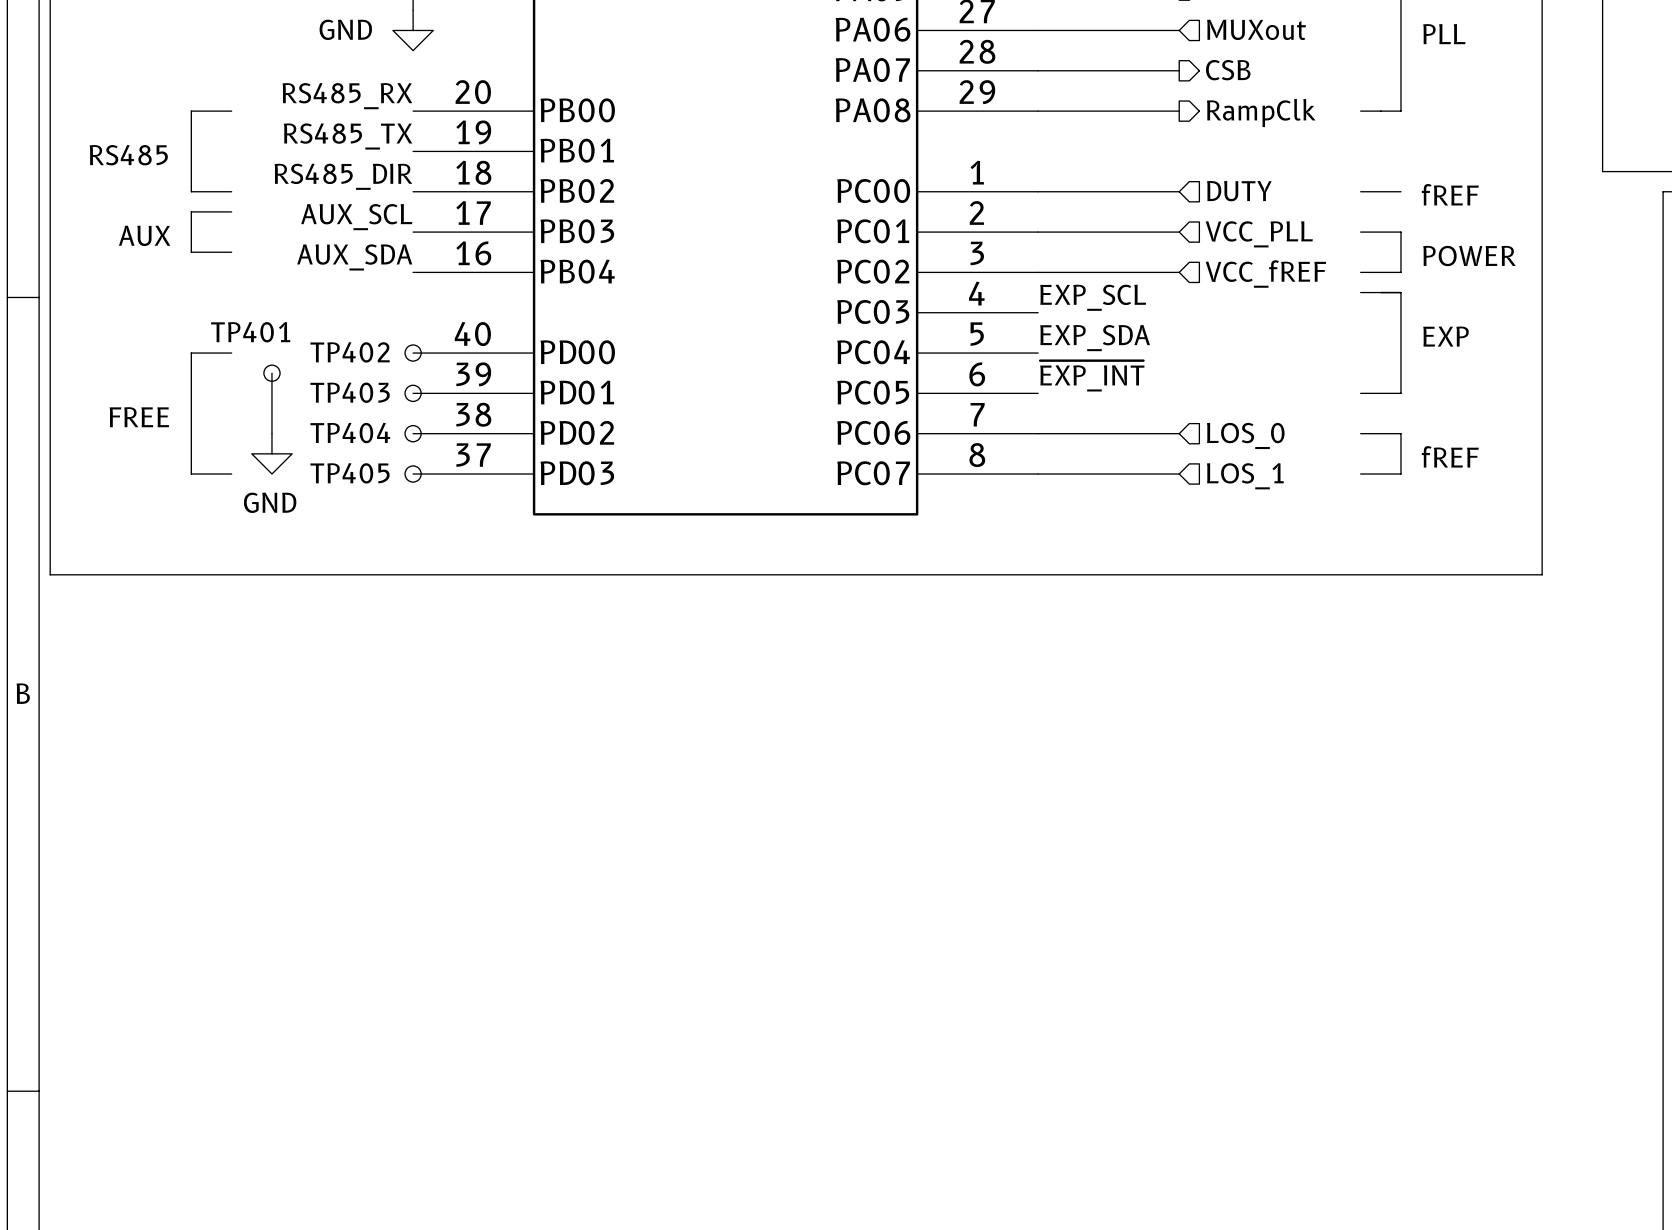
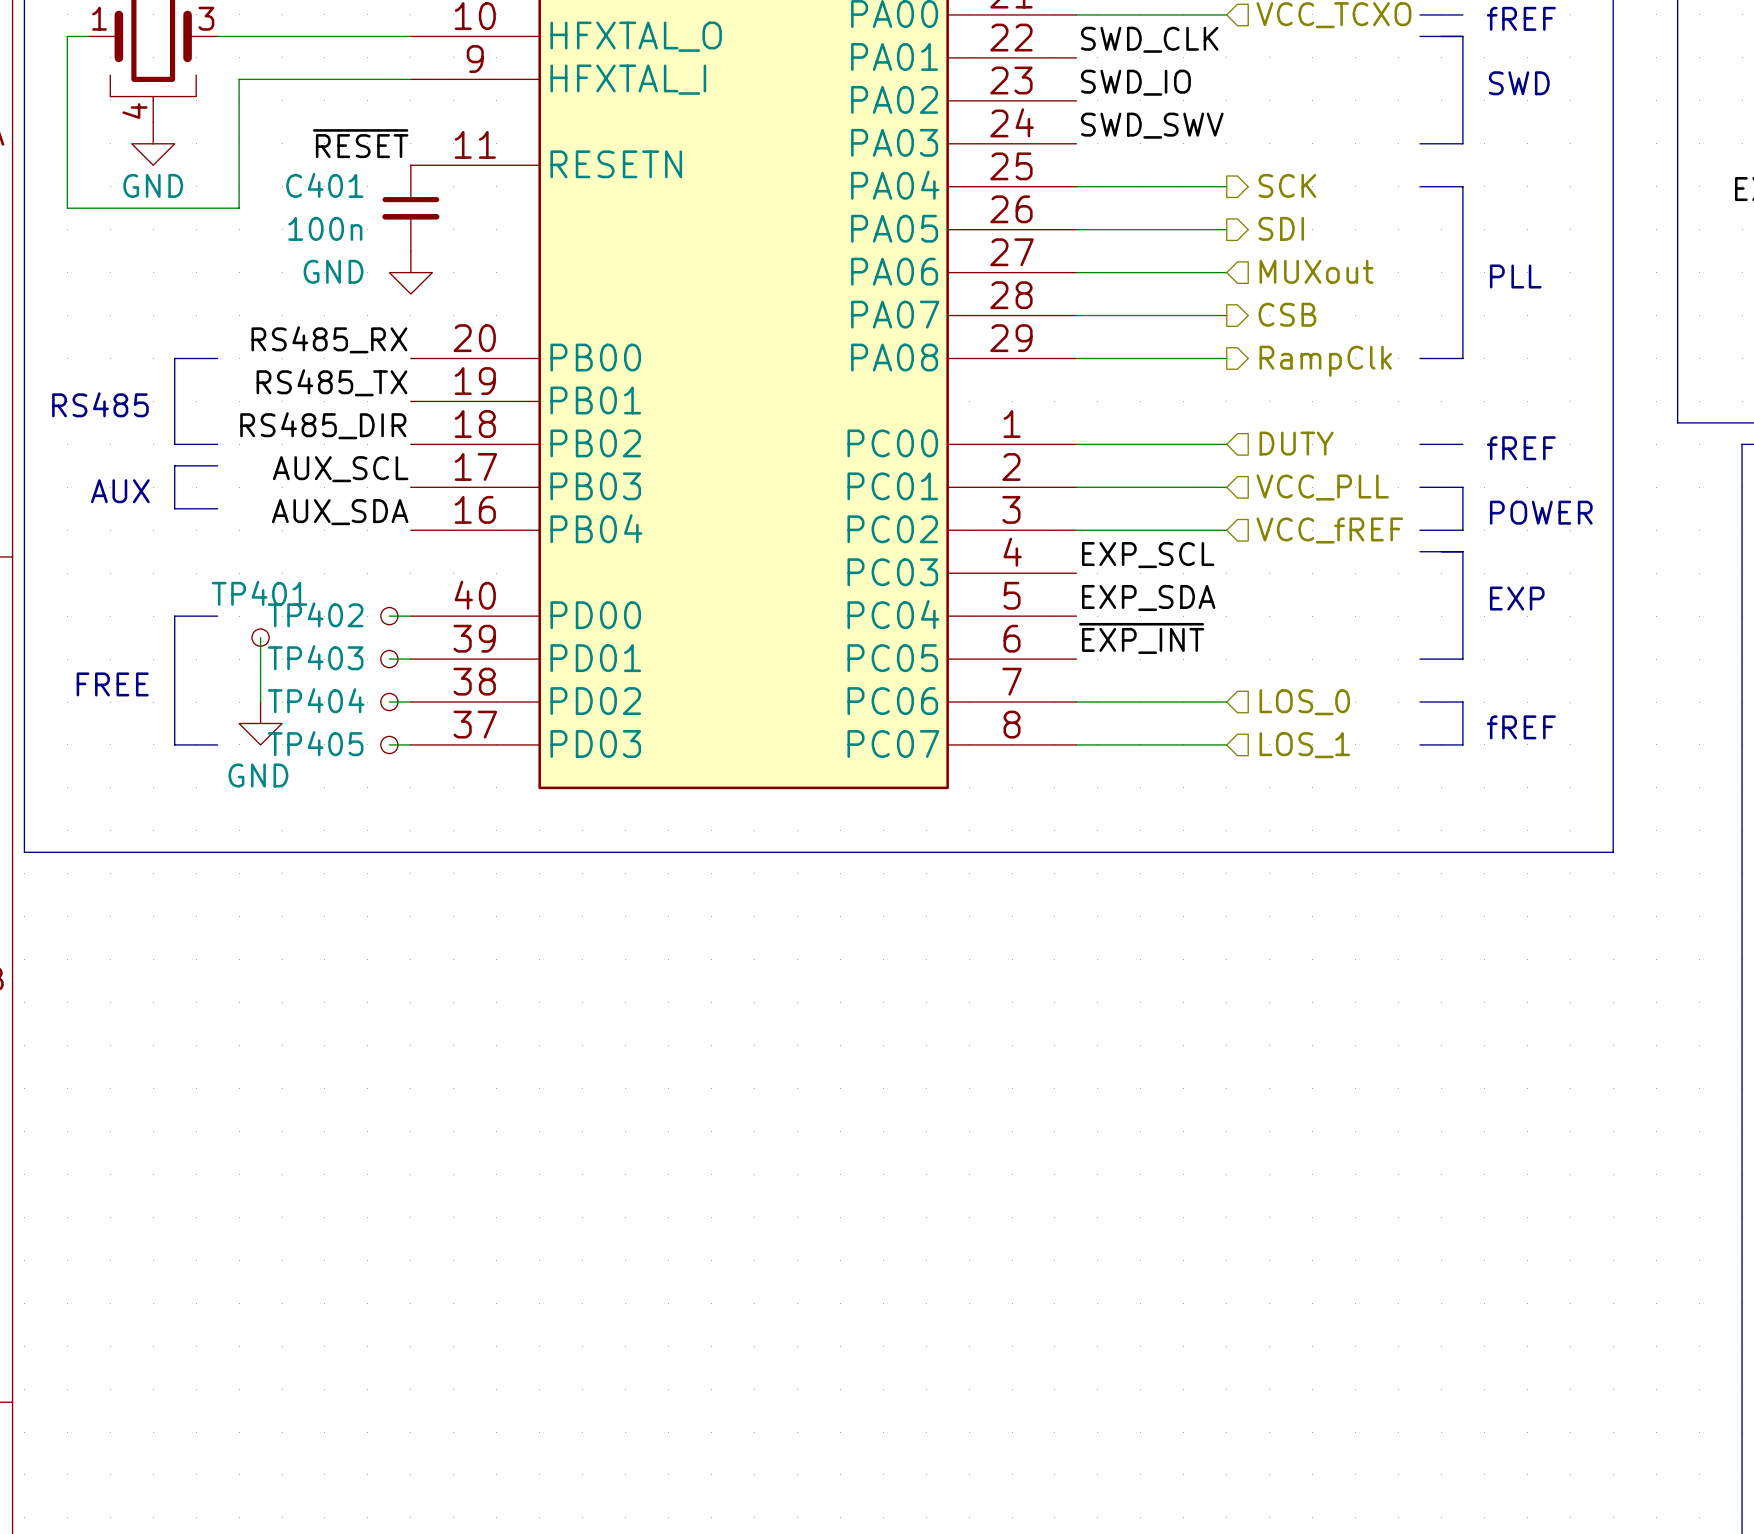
TP401 name position: TP401 (250, 332) -> TP401 (259, 593)
wire: none -> (389, 616) (410, 616)
TP402 position: (413, 353) -> (389, 616)
wire: none -> (389, 659) (410, 659)
TP403 position: (413, 393) -> (389, 659)
wire: none -> (389, 702) (410, 702)
TP404 position: (413, 433) -> (389, 702)
wire: none -> (389, 744) (410, 744)
TP405 position: (413, 474) -> (389, 744)

